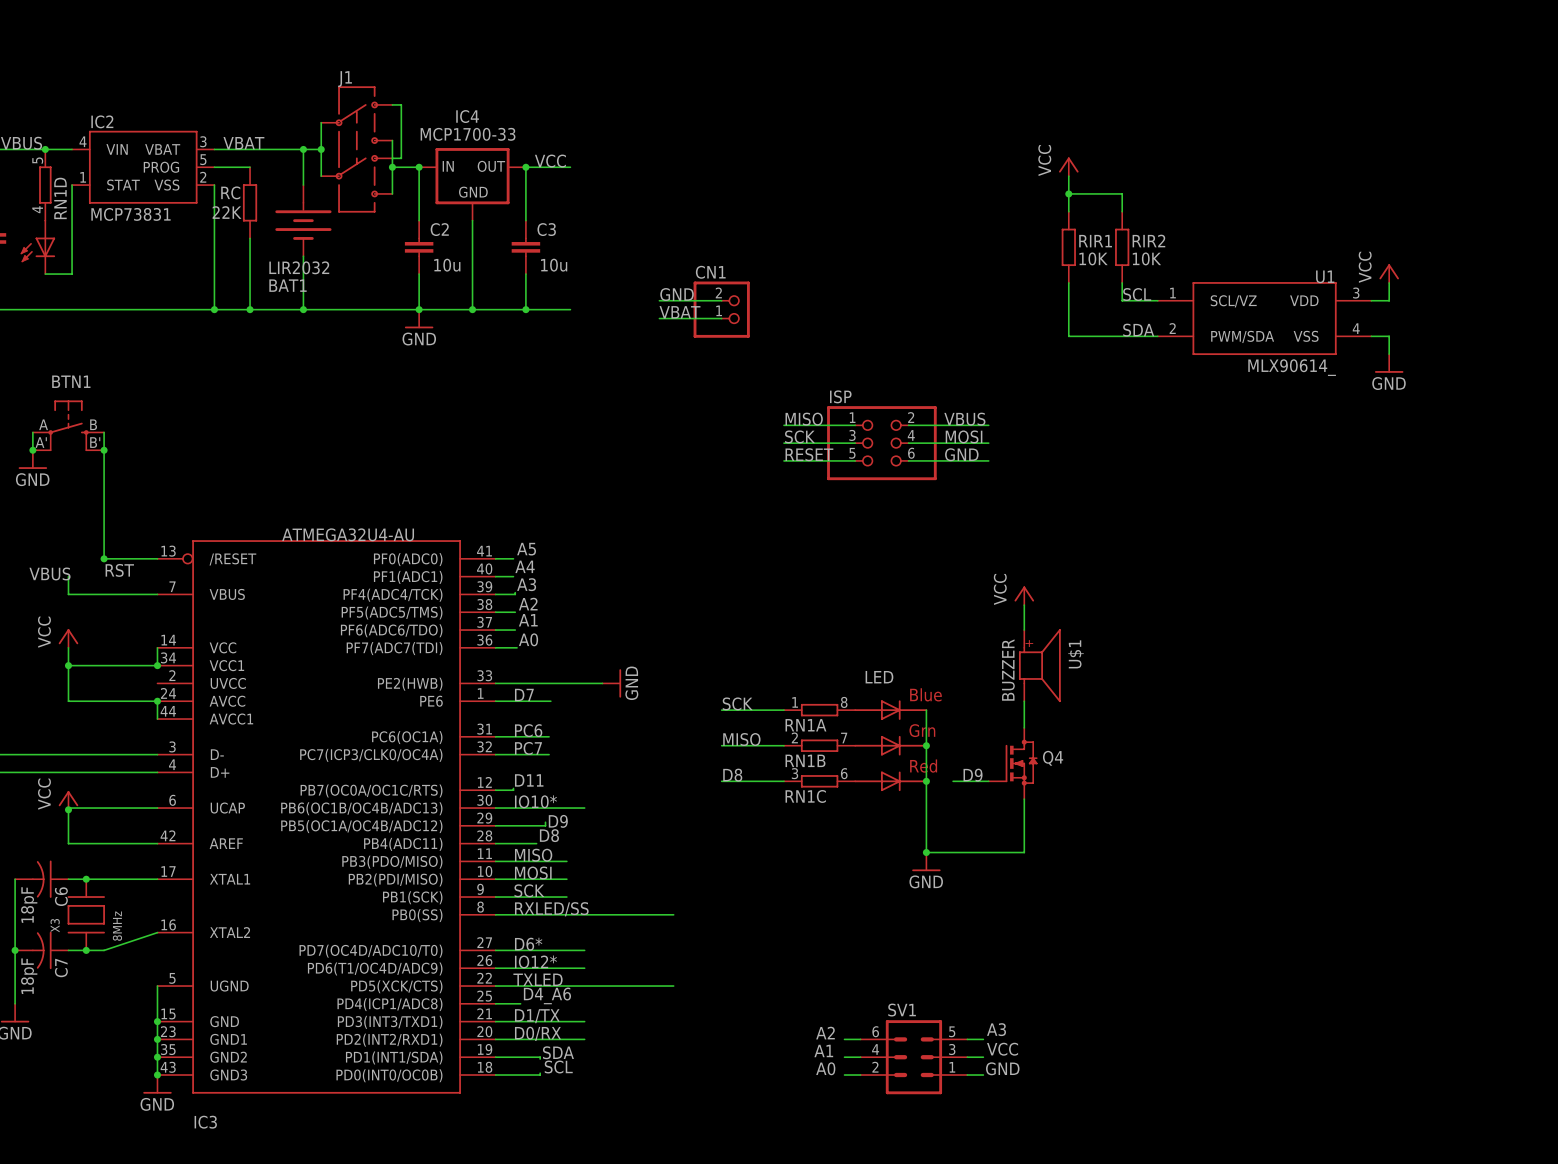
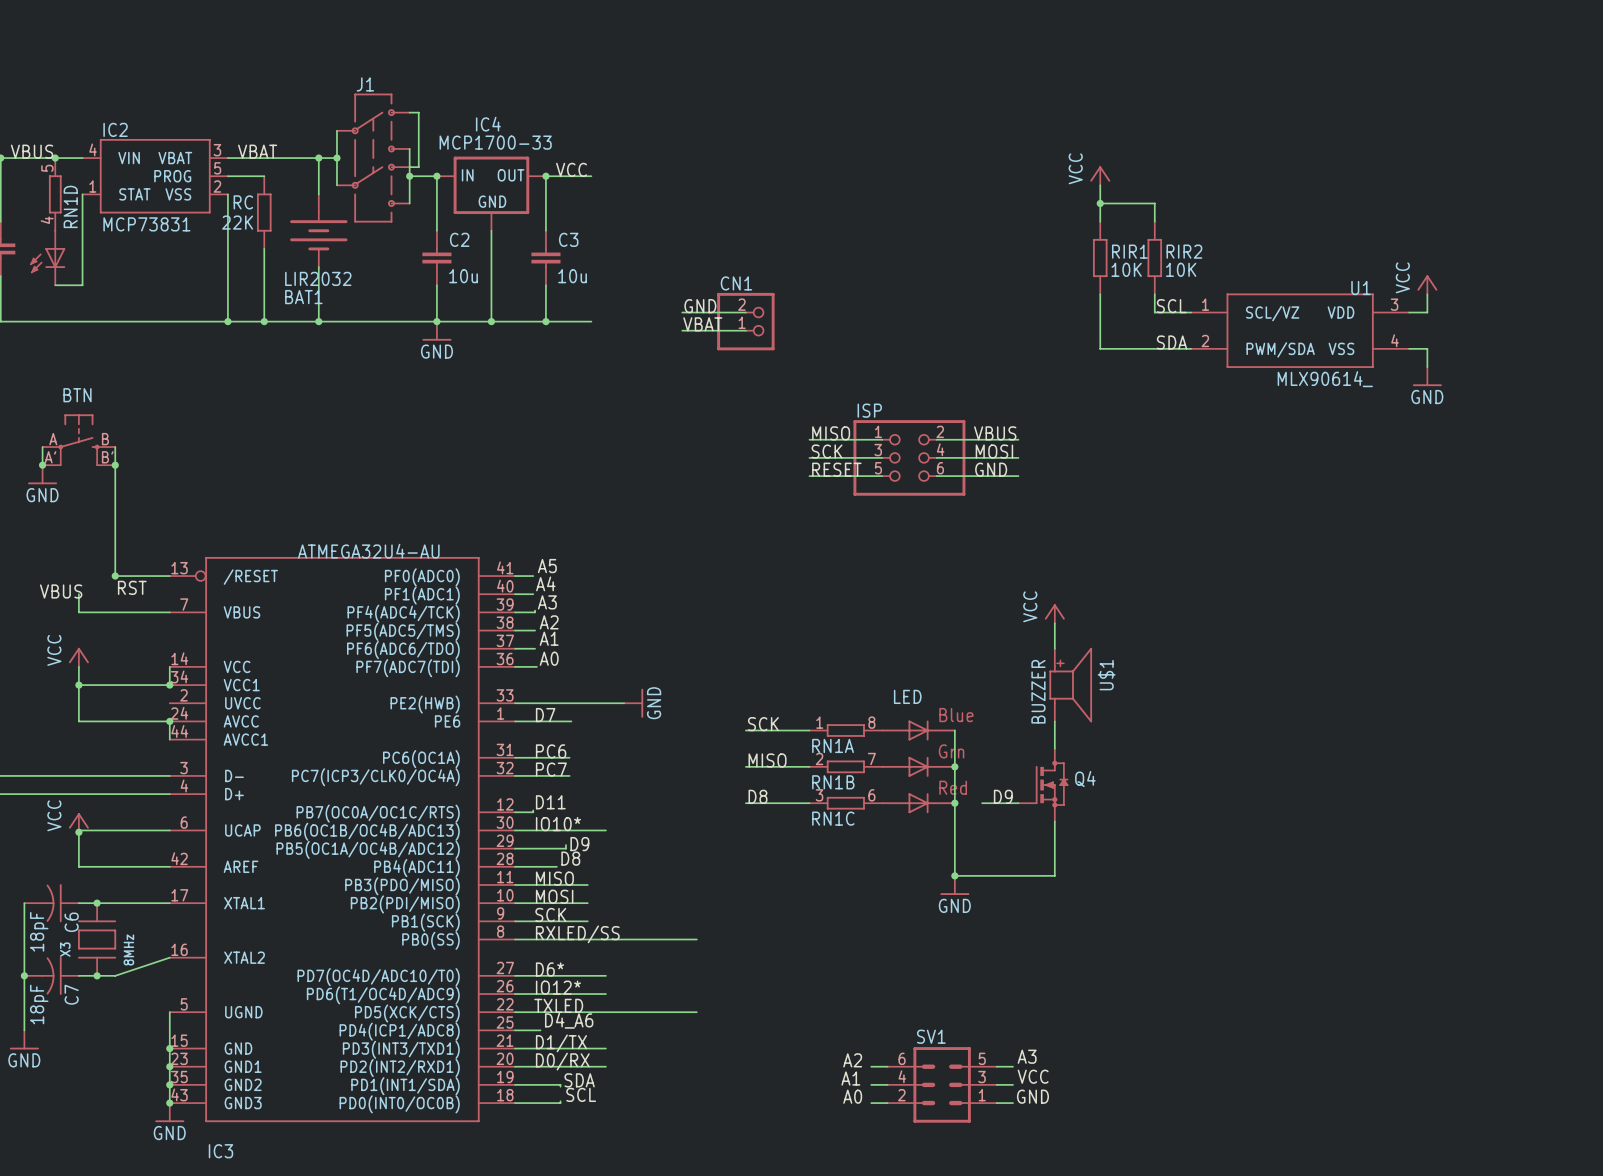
BTN1 name: BTN1 (71, 381) -> BTN (77, 395)

